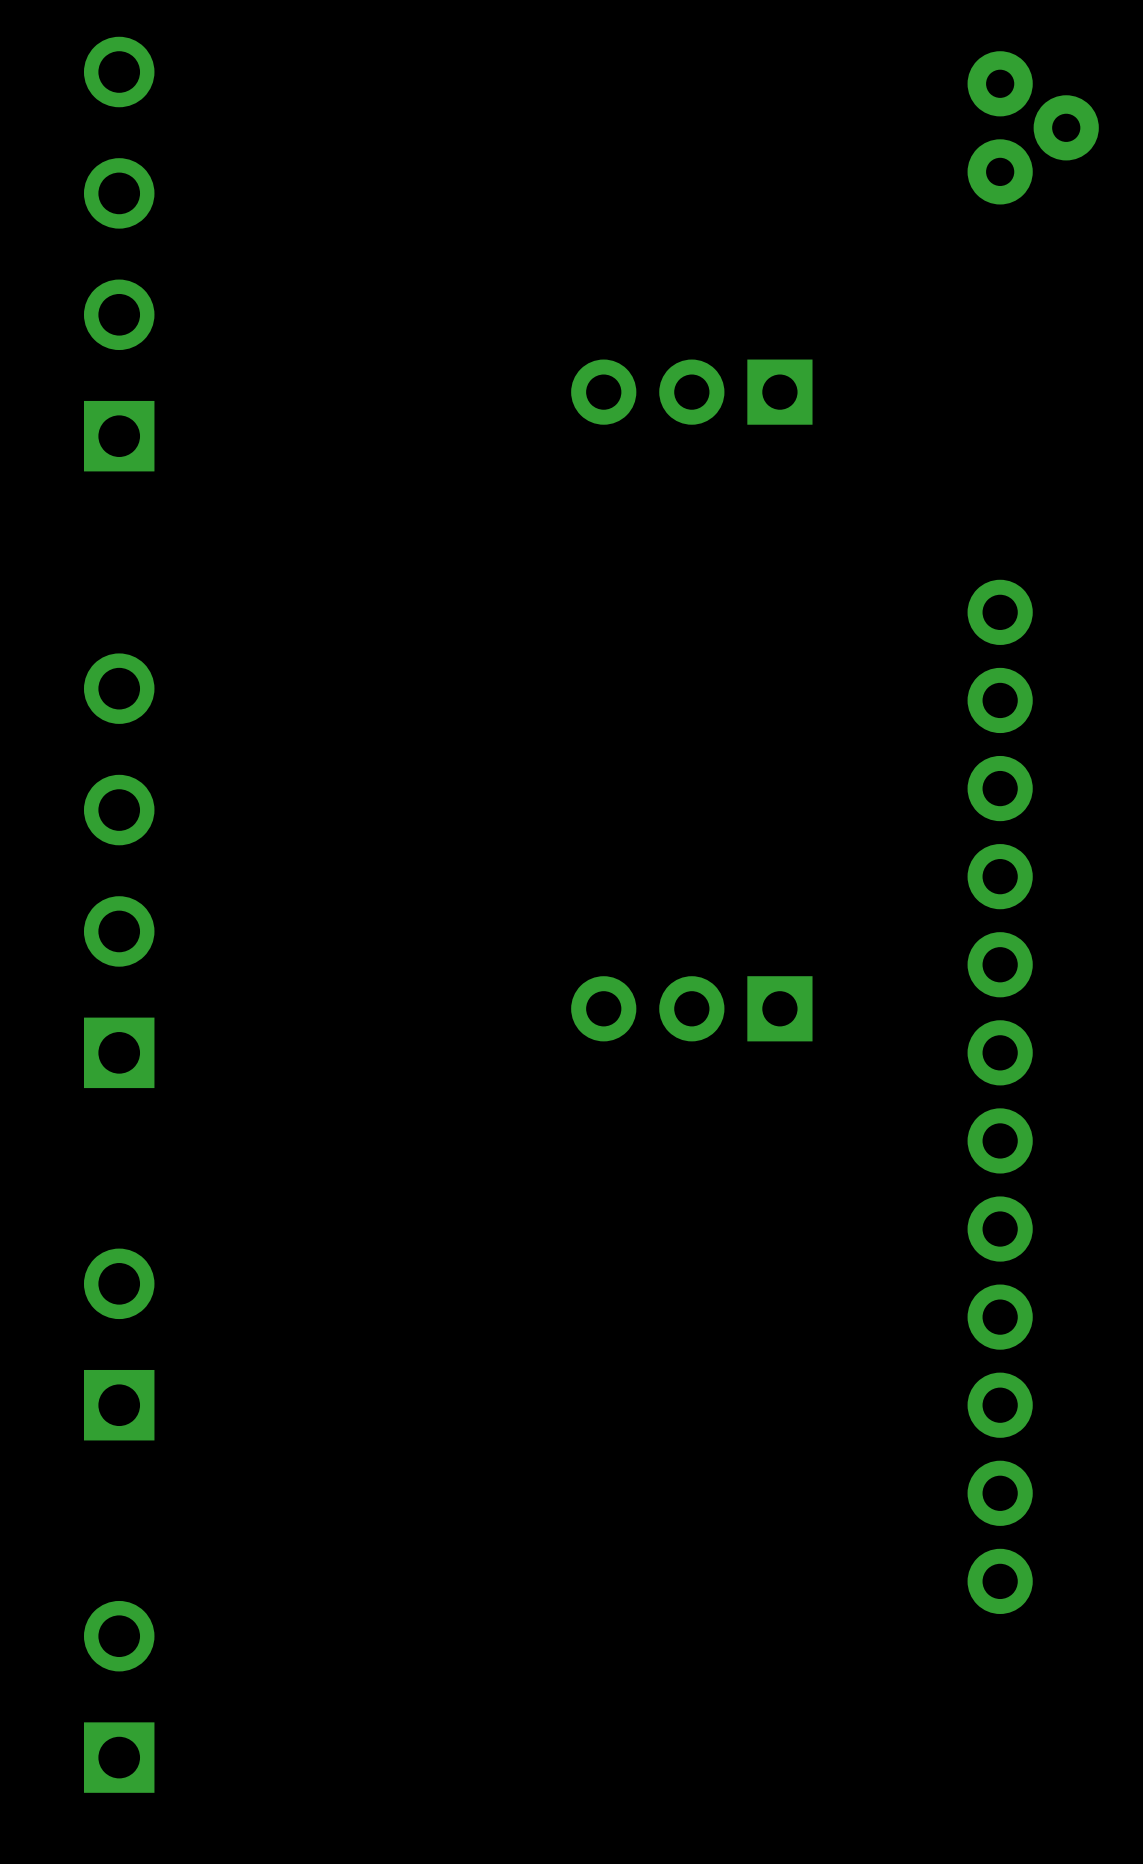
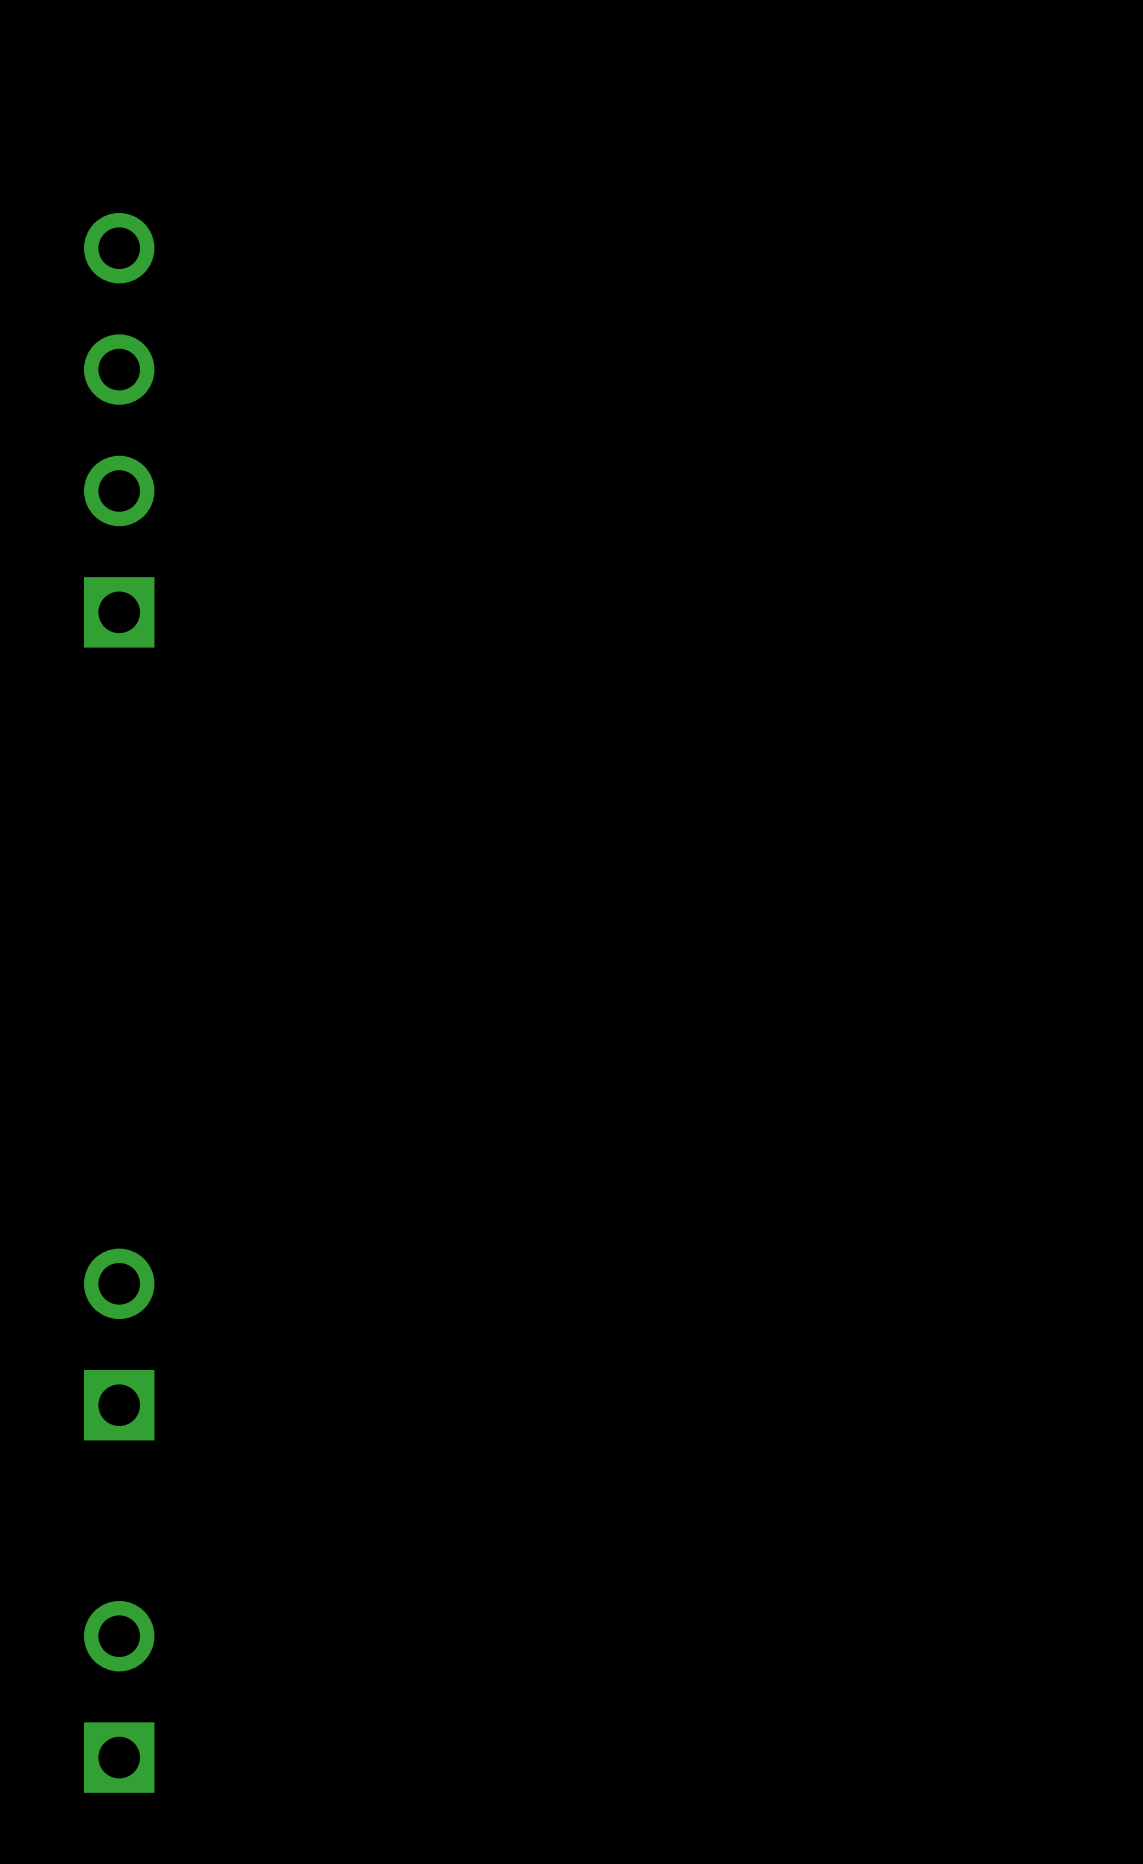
part: (1033, 127) -> none
part position: (119, 254) -> (119, 430)
part: (691, 392) -> none
part: (119, 870) -> none
part: (691, 1008) -> none
part: (1000, 1096) -> none

